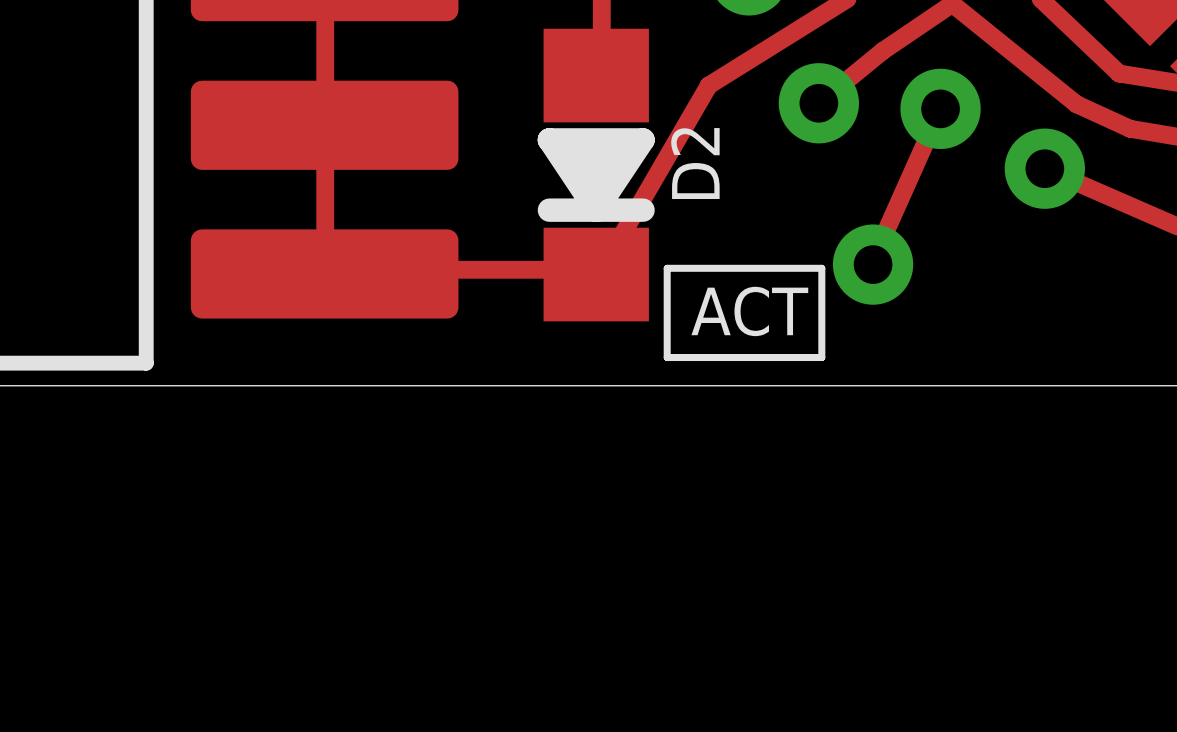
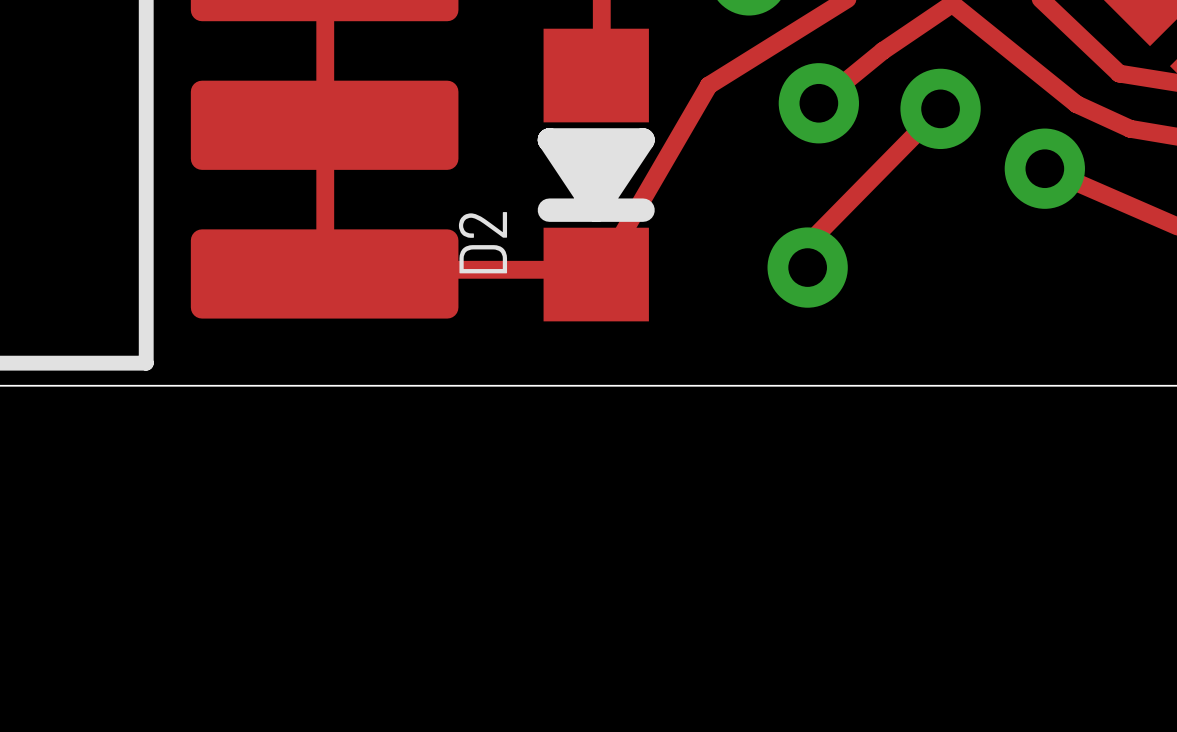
track: (940, 108) (883, 236) (873, 264) -> (940, 108) (813, 237) (807, 267)
D2 name position: D2 (695, 163) -> D2 (482, 242)
via position: (873, 264) -> (807, 267)
line: (667, 268) (667, 357) (821, 357) (821, 268) (667, 268) -> none
text: ACT (749, 311) -> none

